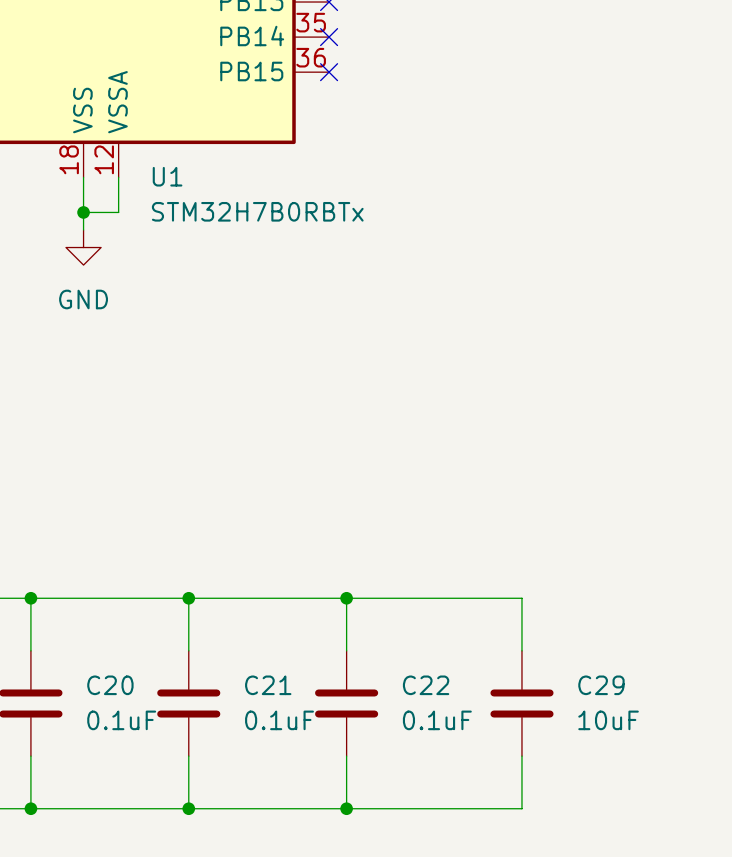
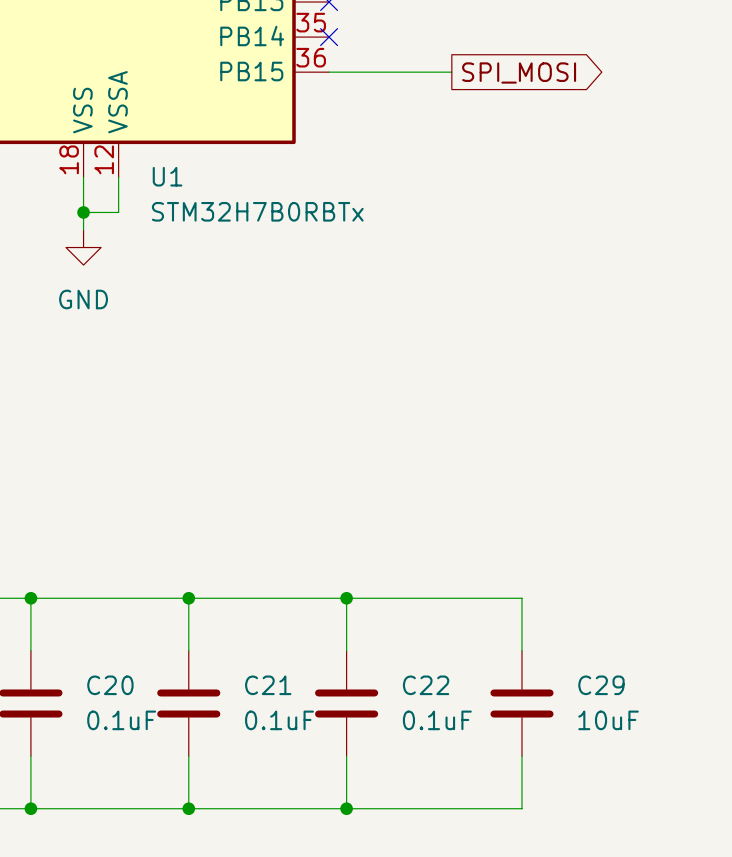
wire: none -> (329, 72) (451, 72)
no-connect mark: (329, 72) -> none
global label: none -> SPI_MOSI (519, 72)

